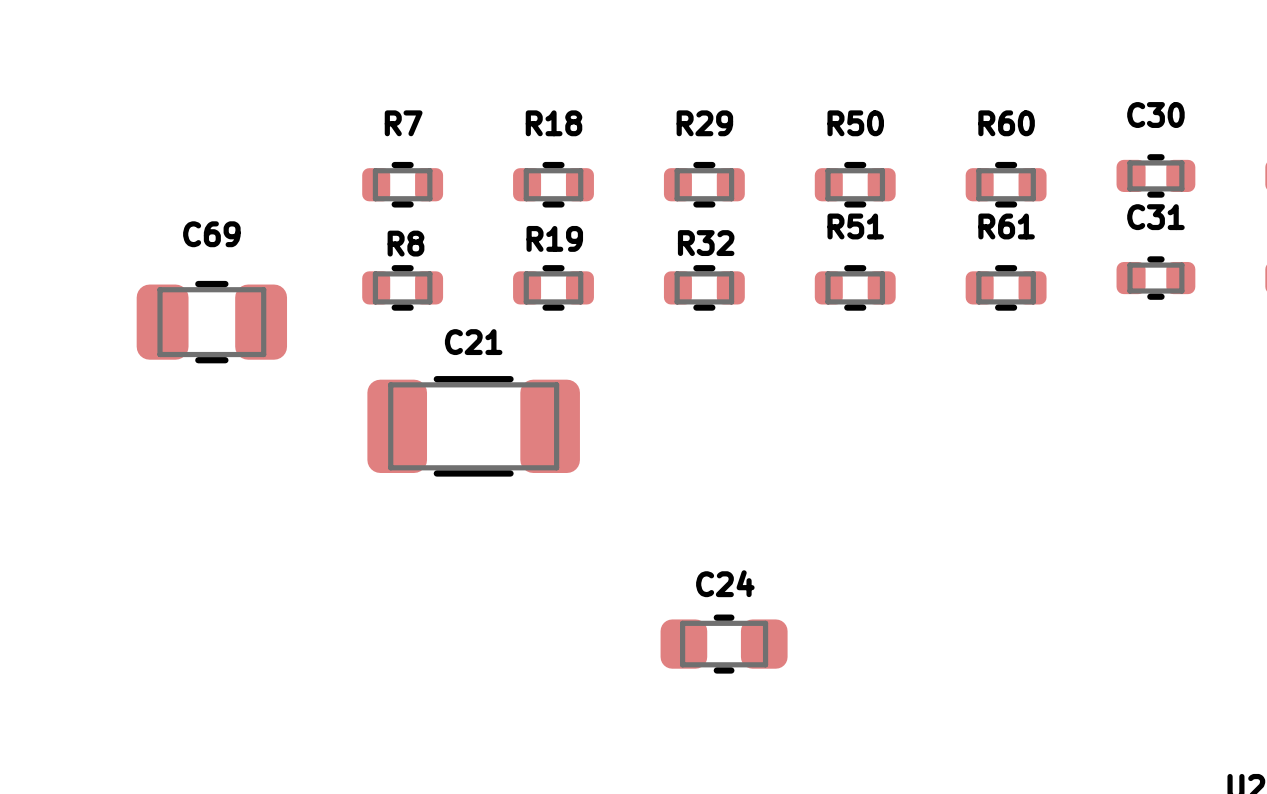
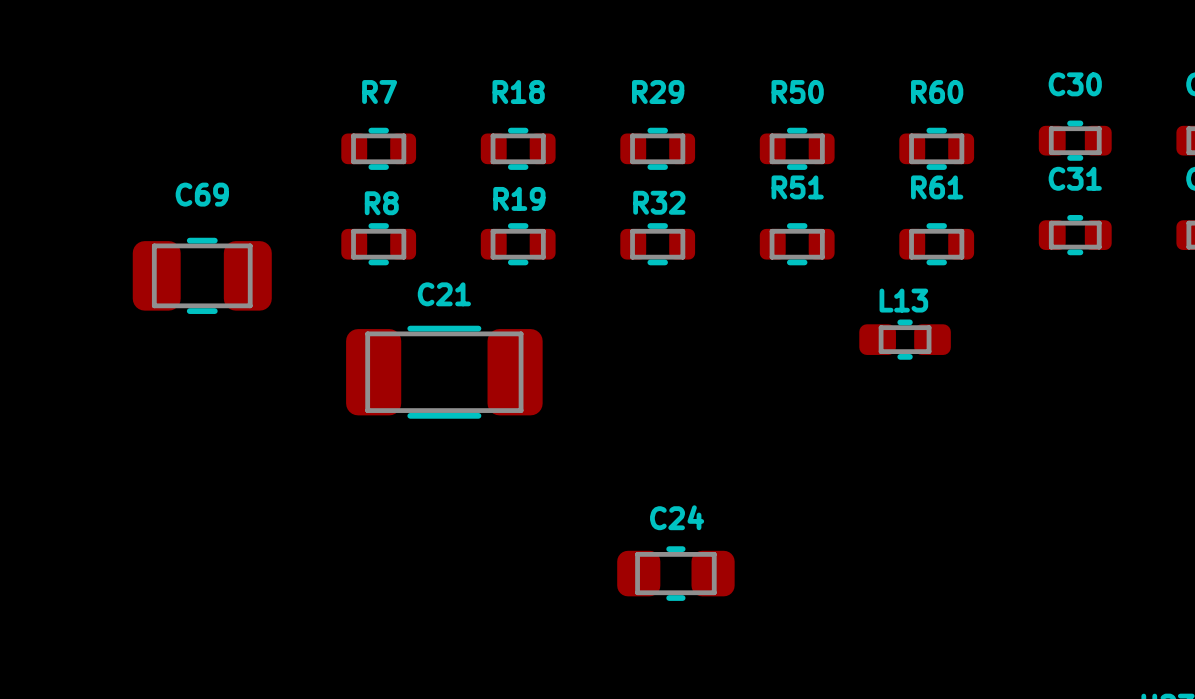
L13: none -> (905, 339)

